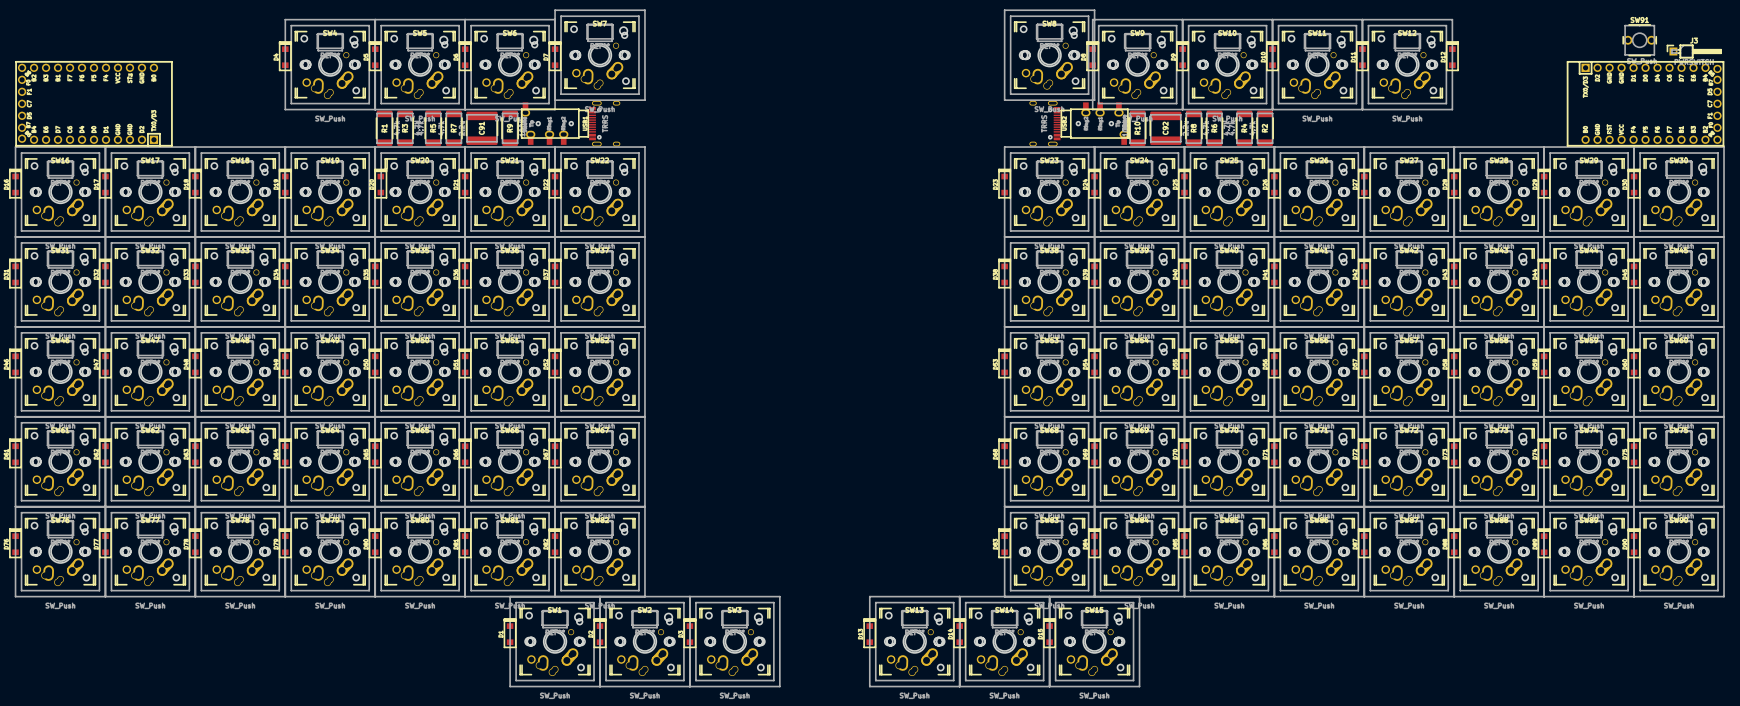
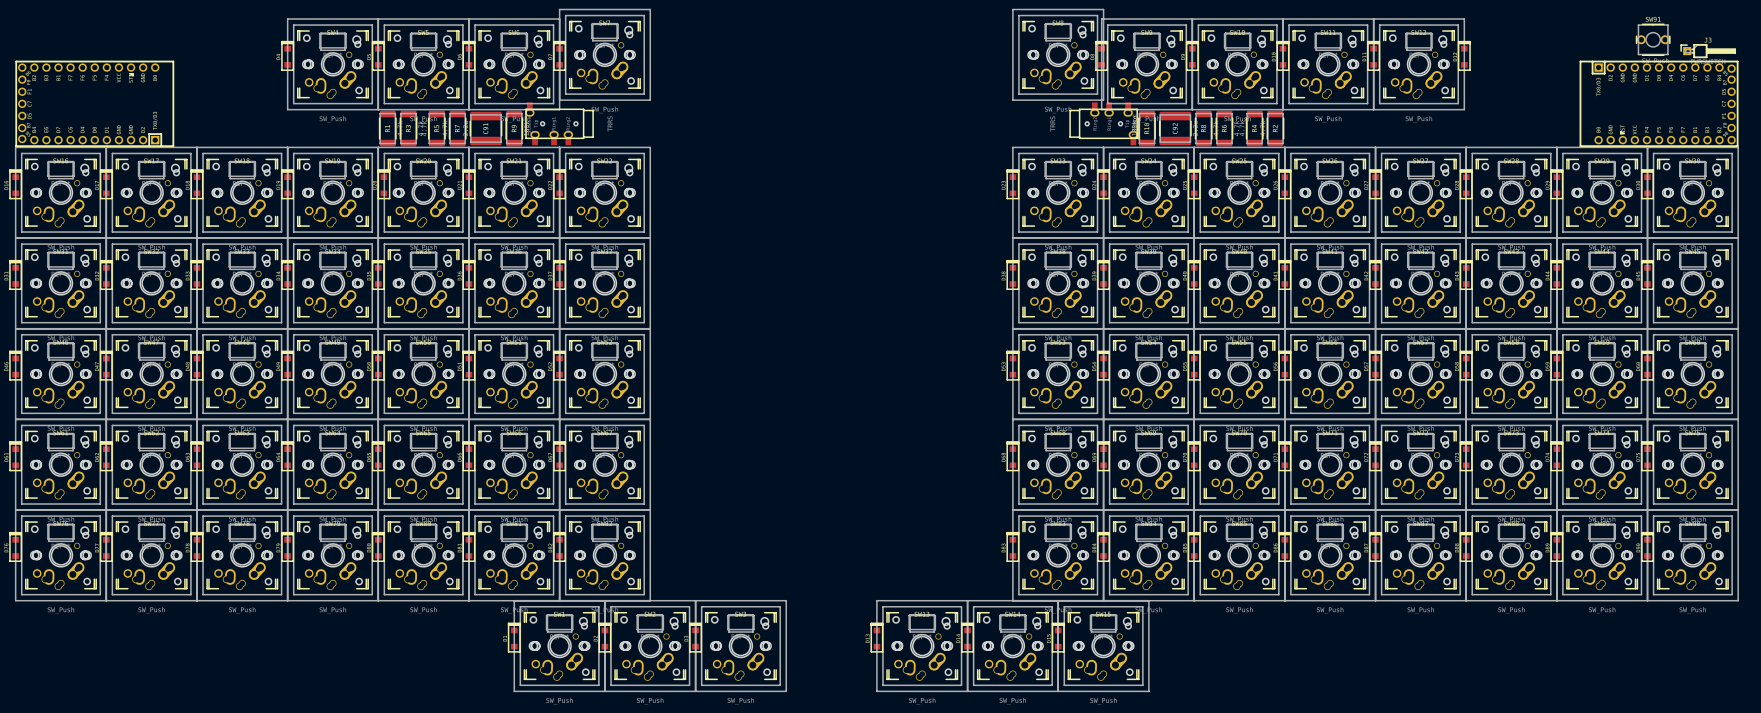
part: (604, 123) -> none
part: (1044, 123) -> none

